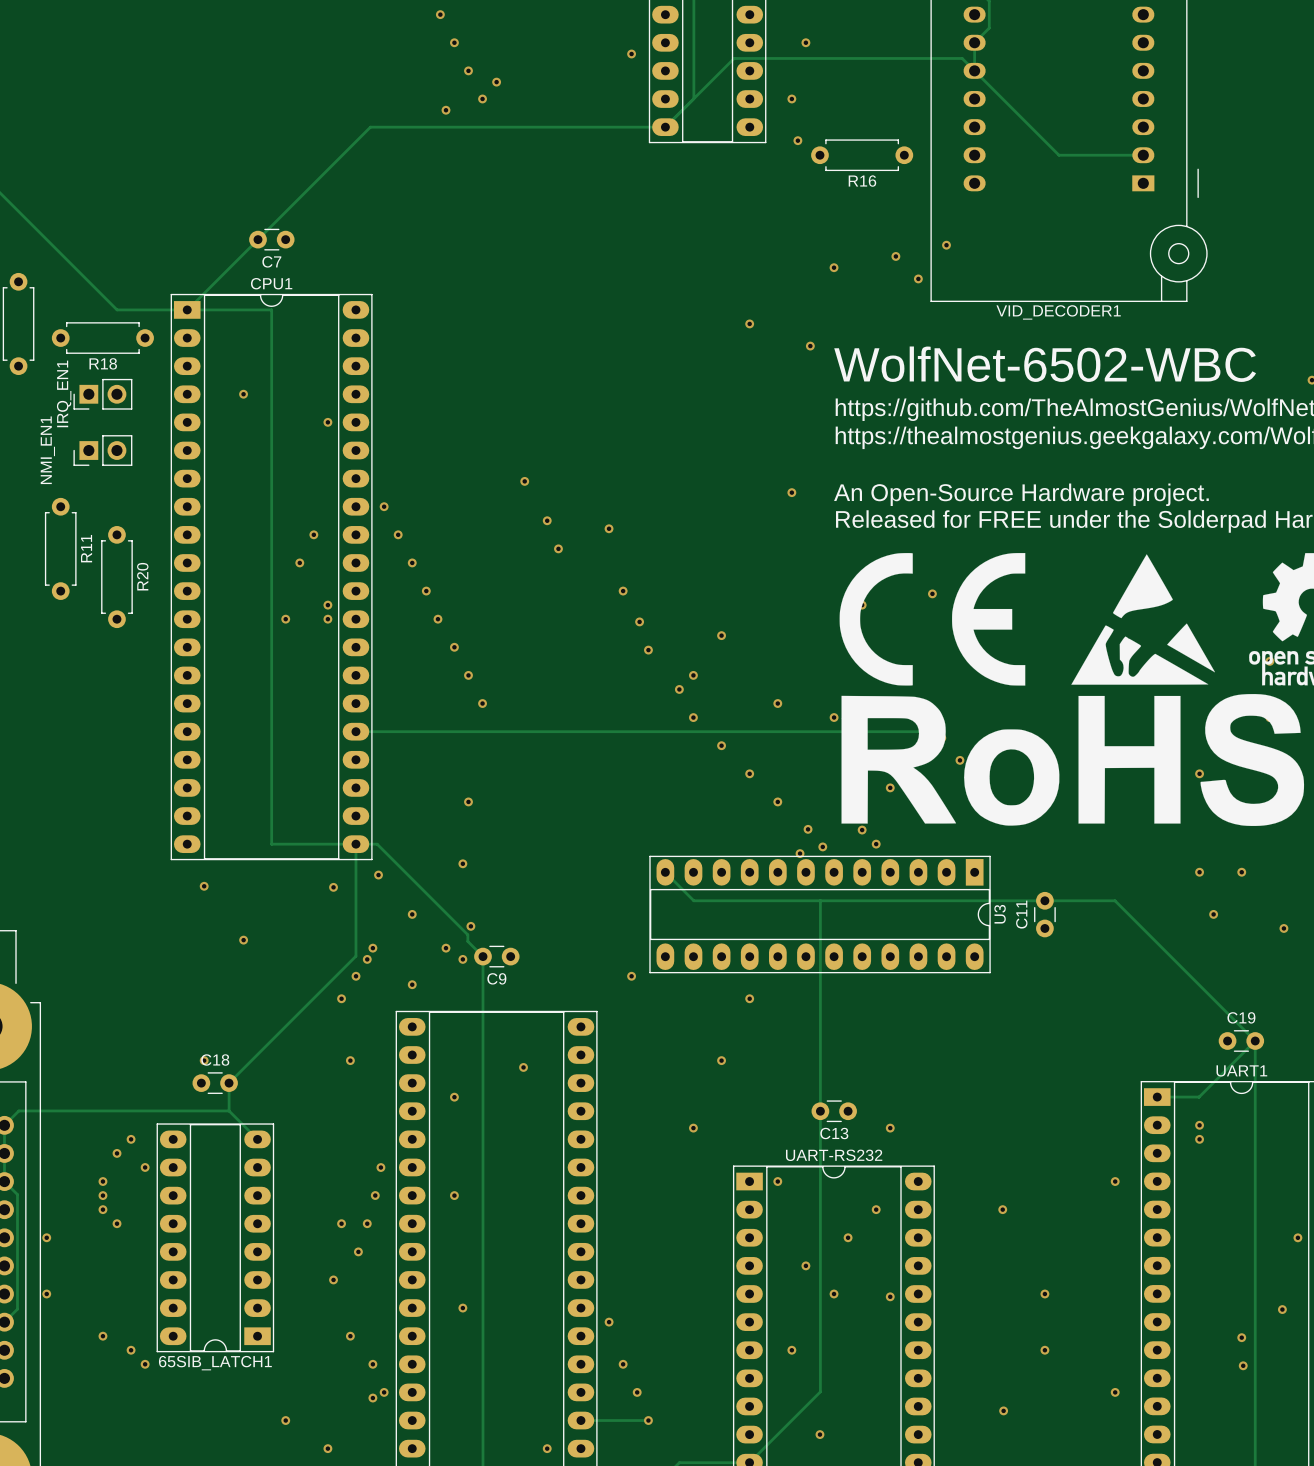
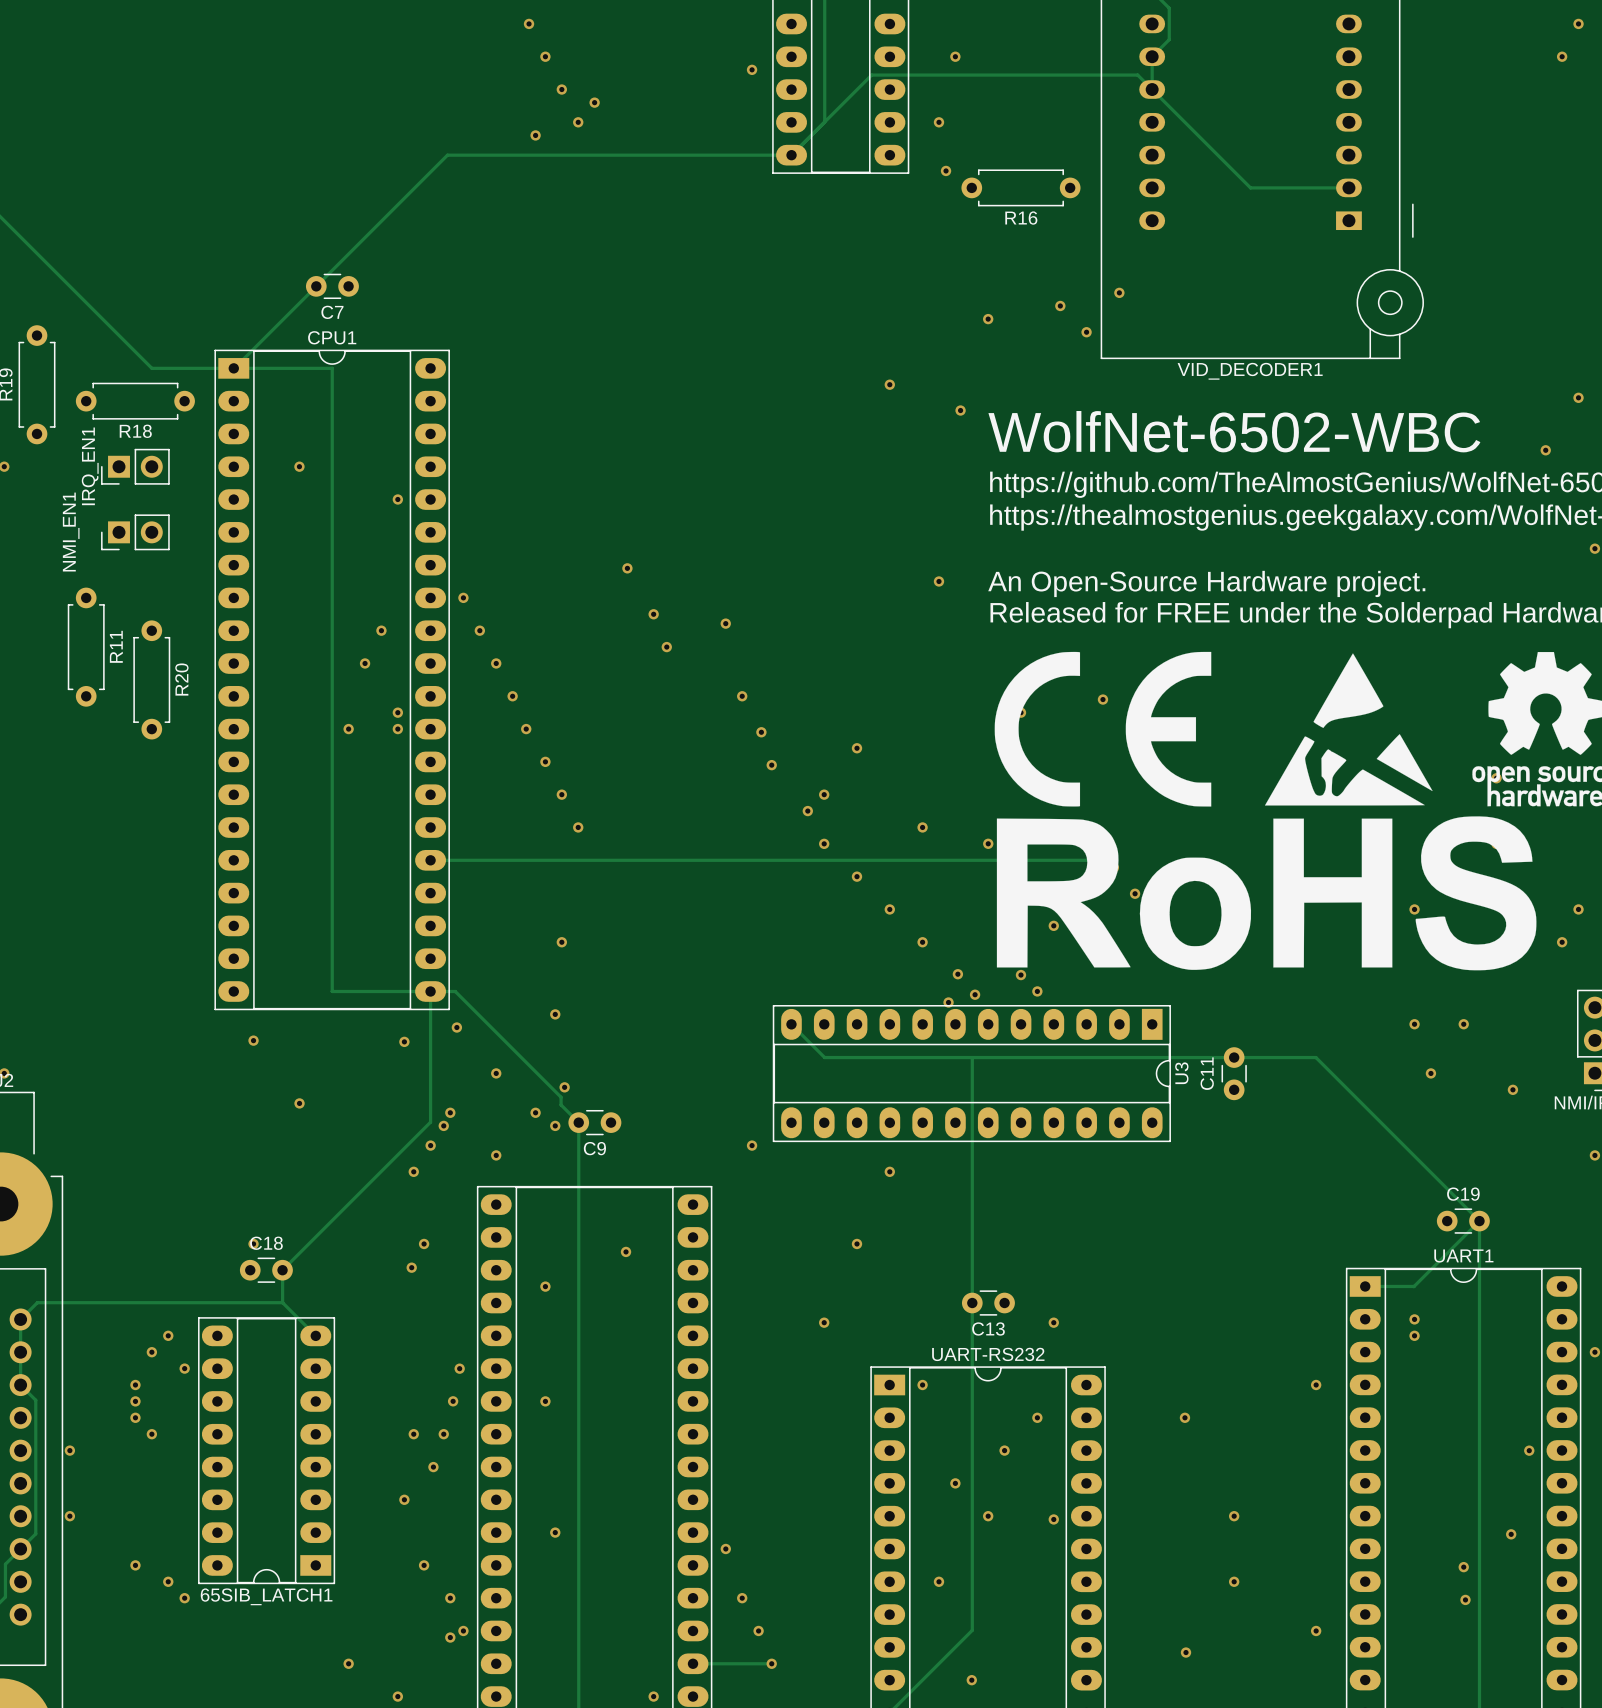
via: none -> (411, 1267)

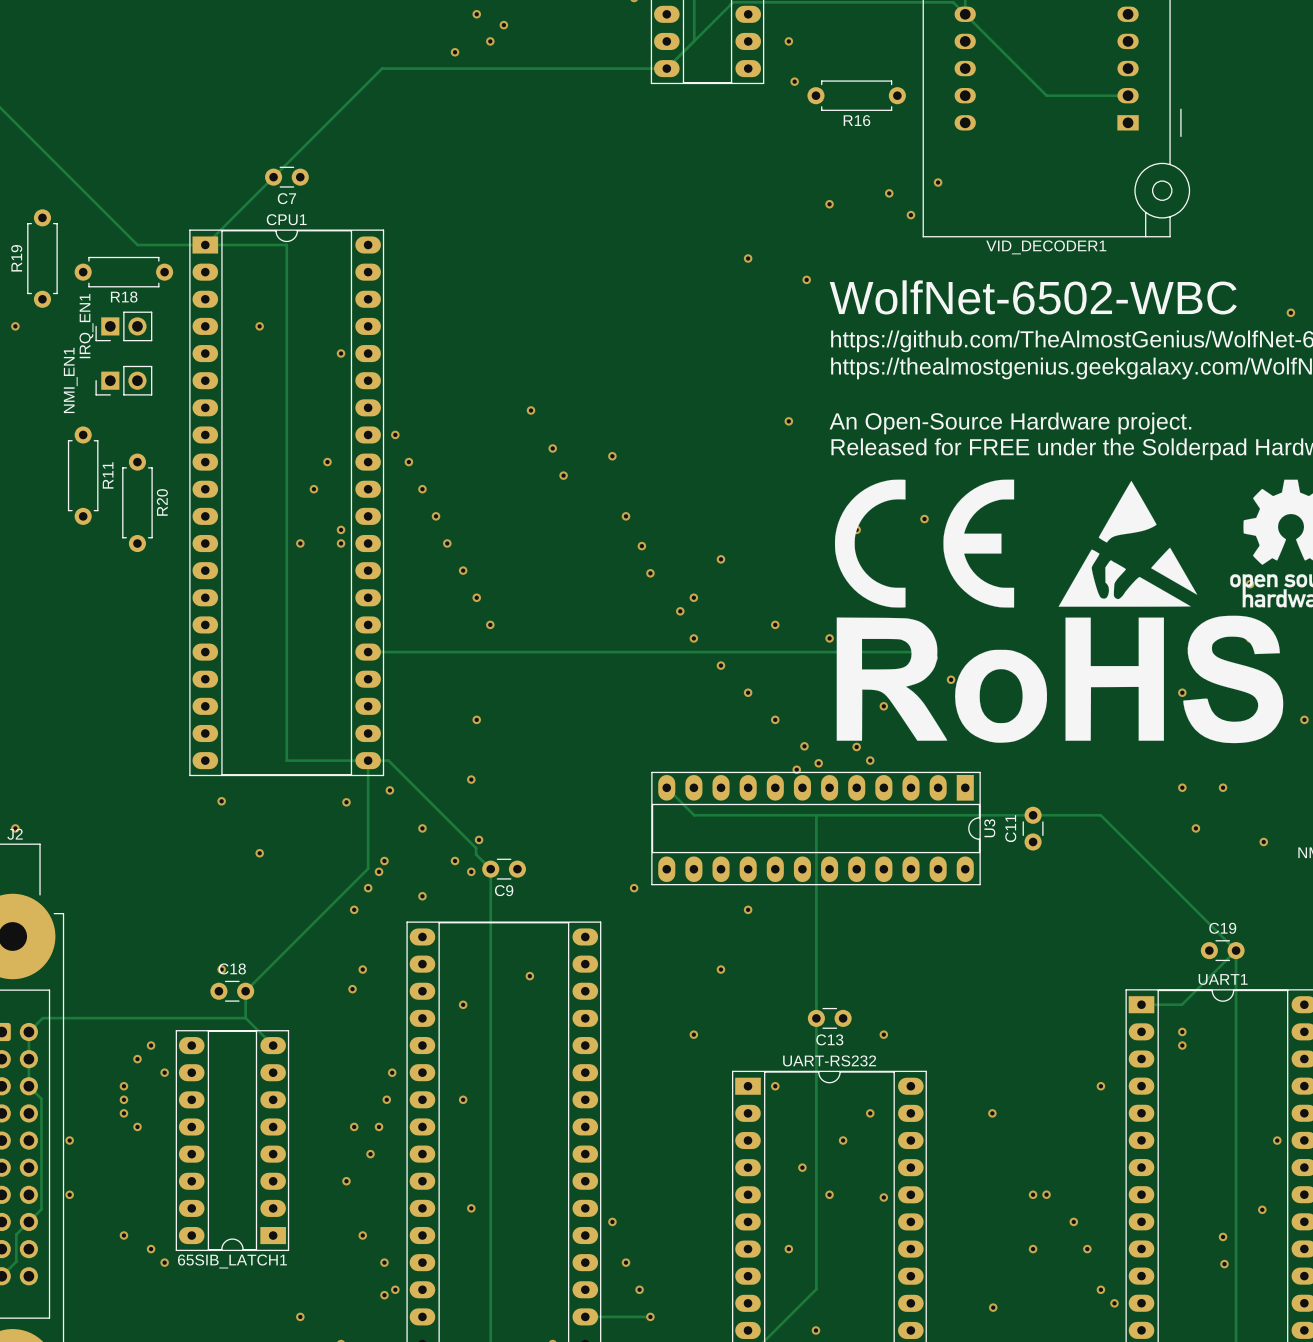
via: none -> (1046, 1194)
via: none -> (1073, 1221)
via: none -> (1087, 1249)
via: none -> (1114, 1303)

